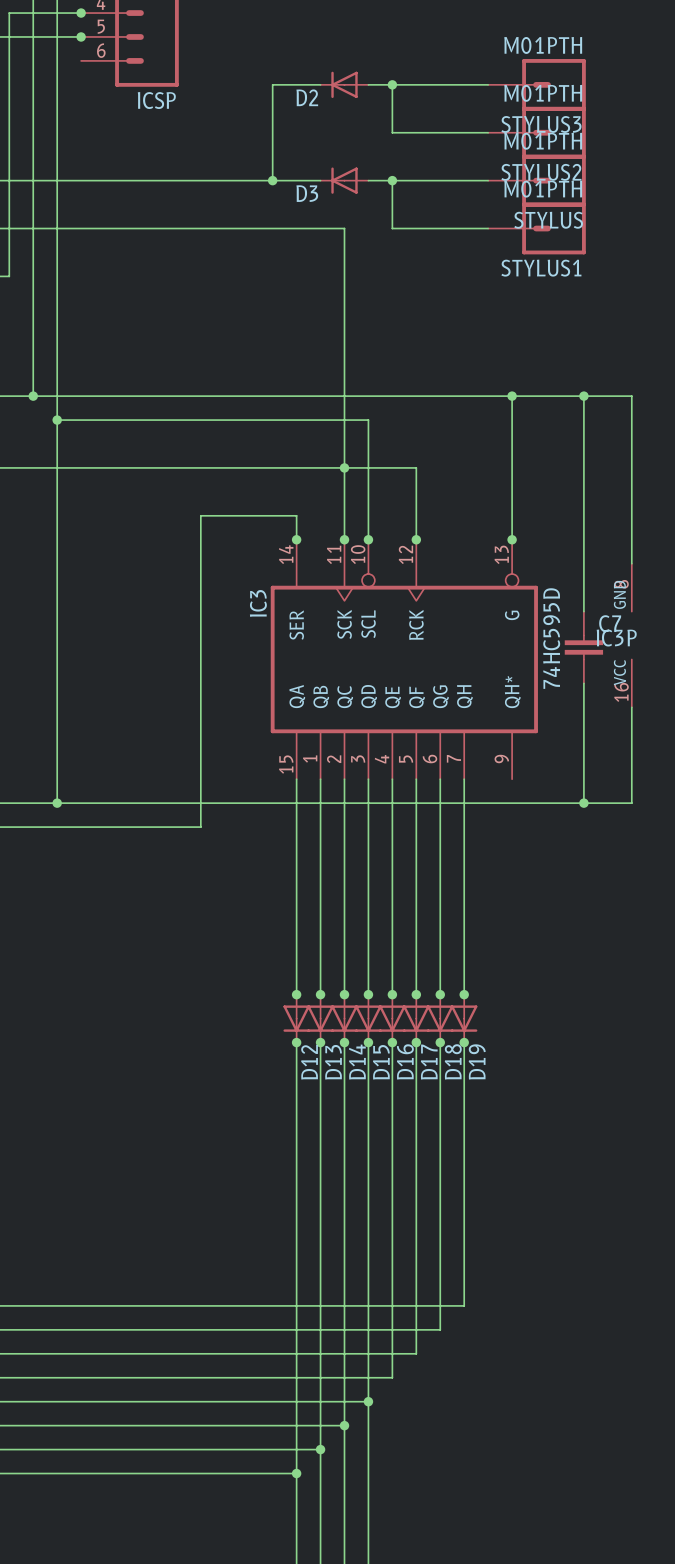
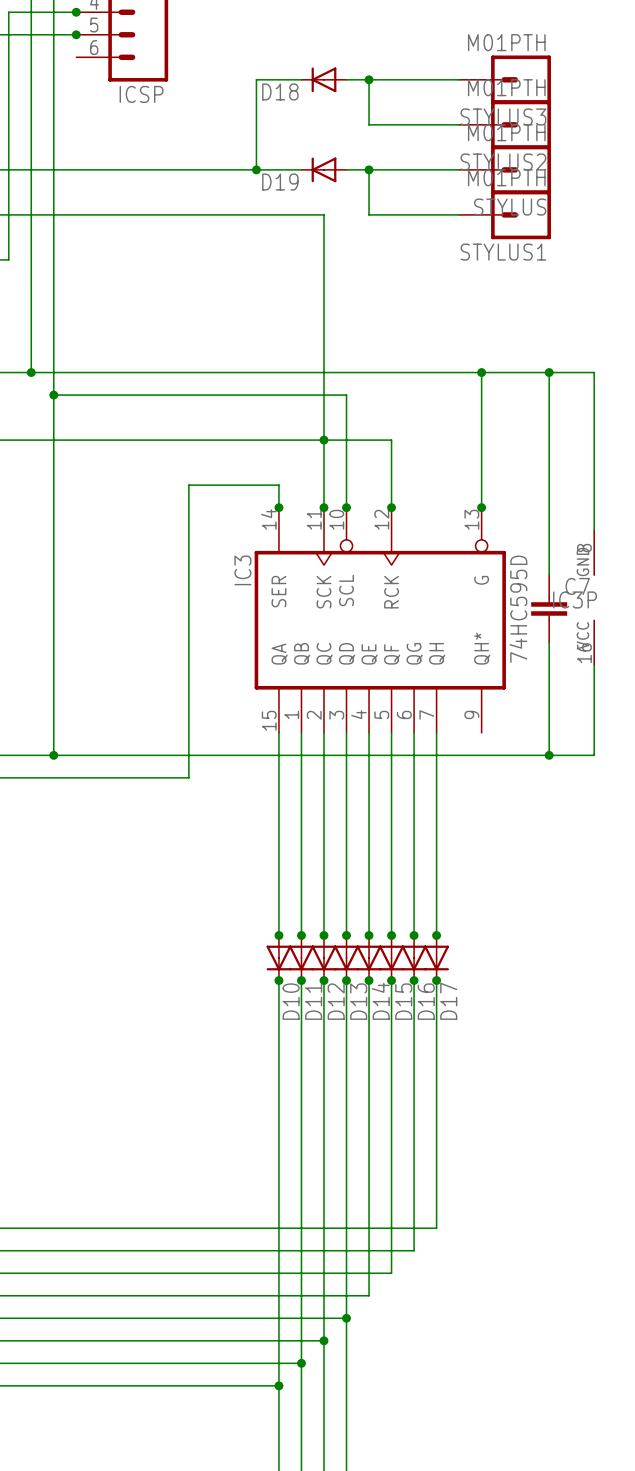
D2 name: D2 (307, 97) -> D18 (280, 91)
D3 name: D3 (307, 193) -> D19 (280, 182)
D16 name: D16 (405, 1061) -> D14 (380, 1001)
D18 name: D18 (453, 1061) -> D16 (426, 1001)
D19 name: D19 (477, 1061) -> D17 (448, 1001)
D12 name: D12 (309, 1062) -> D10 (291, 1001)
D13 name: D13 (333, 1062) -> D11 (313, 1001)
D14 name: D14 (357, 1062) -> D12 (336, 1001)
D15 name: D15 (381, 1062) -> D13 (358, 1001)
D17 name: D17 (429, 1062) -> D15 (403, 1001)

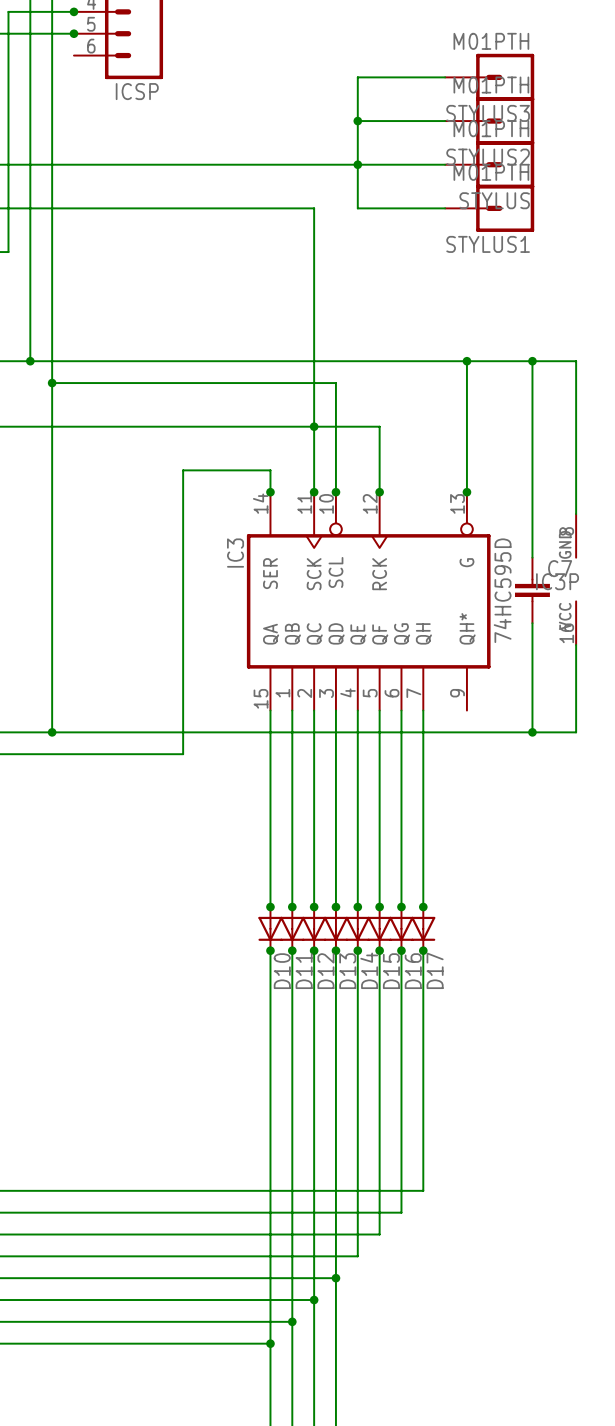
wire: (301, 79) (256, 79) (256, 169) -> none
D18: (323, 79) -> none
wire: (346, 79) (369, 79) -> none
junction position: (369, 79) -> (357, 121)
wire: none -> (357, 121) (357, 164)
junction: (256, 169) -> none
D19: (323, 169) -> none

